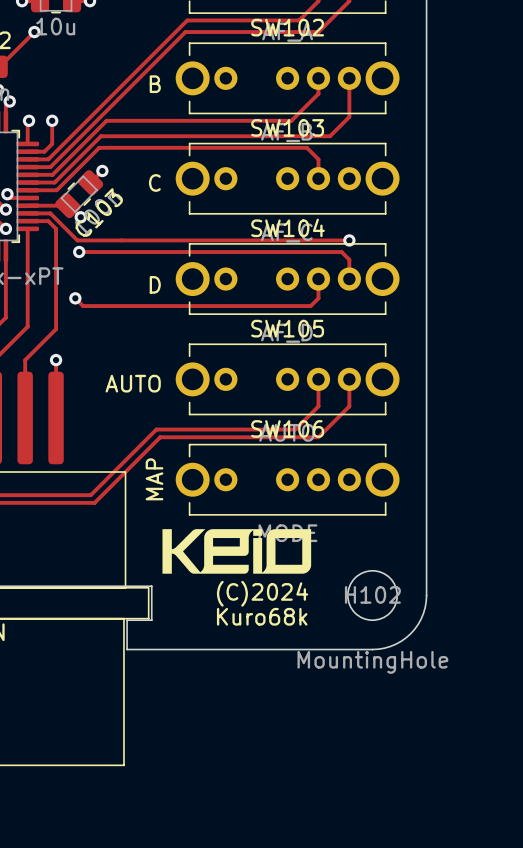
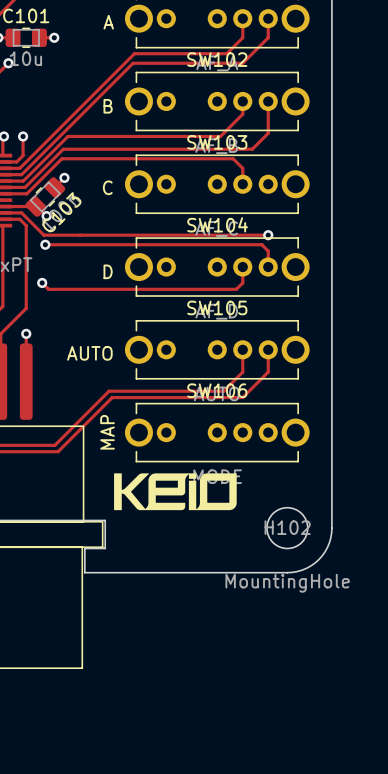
text: (C)2024 (262, 593) -> none
text: Kuro68k (262, 616) -> none

